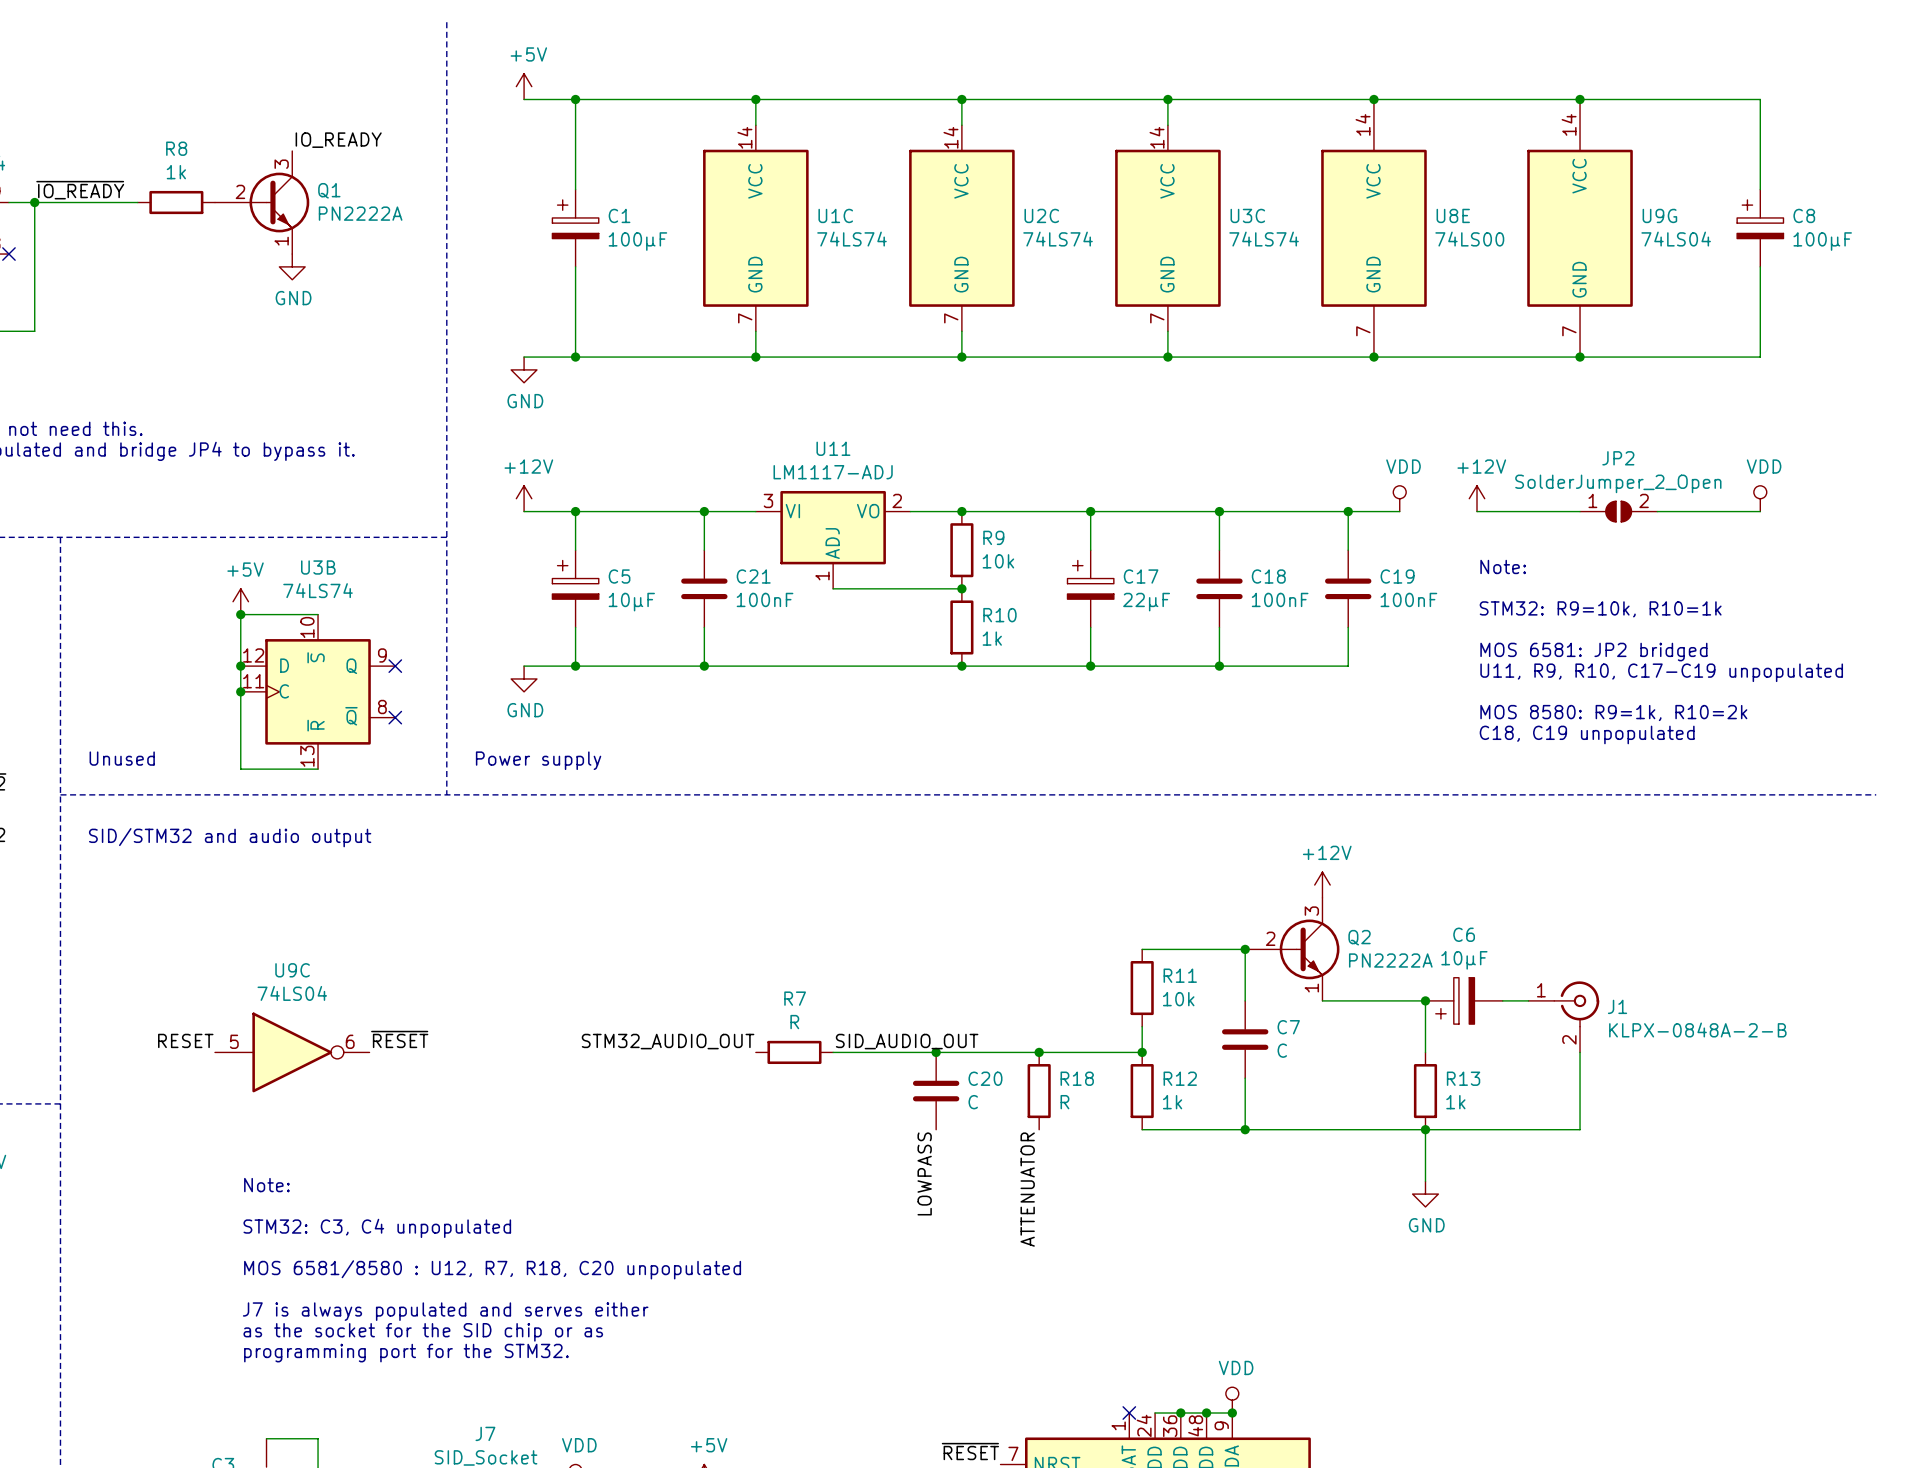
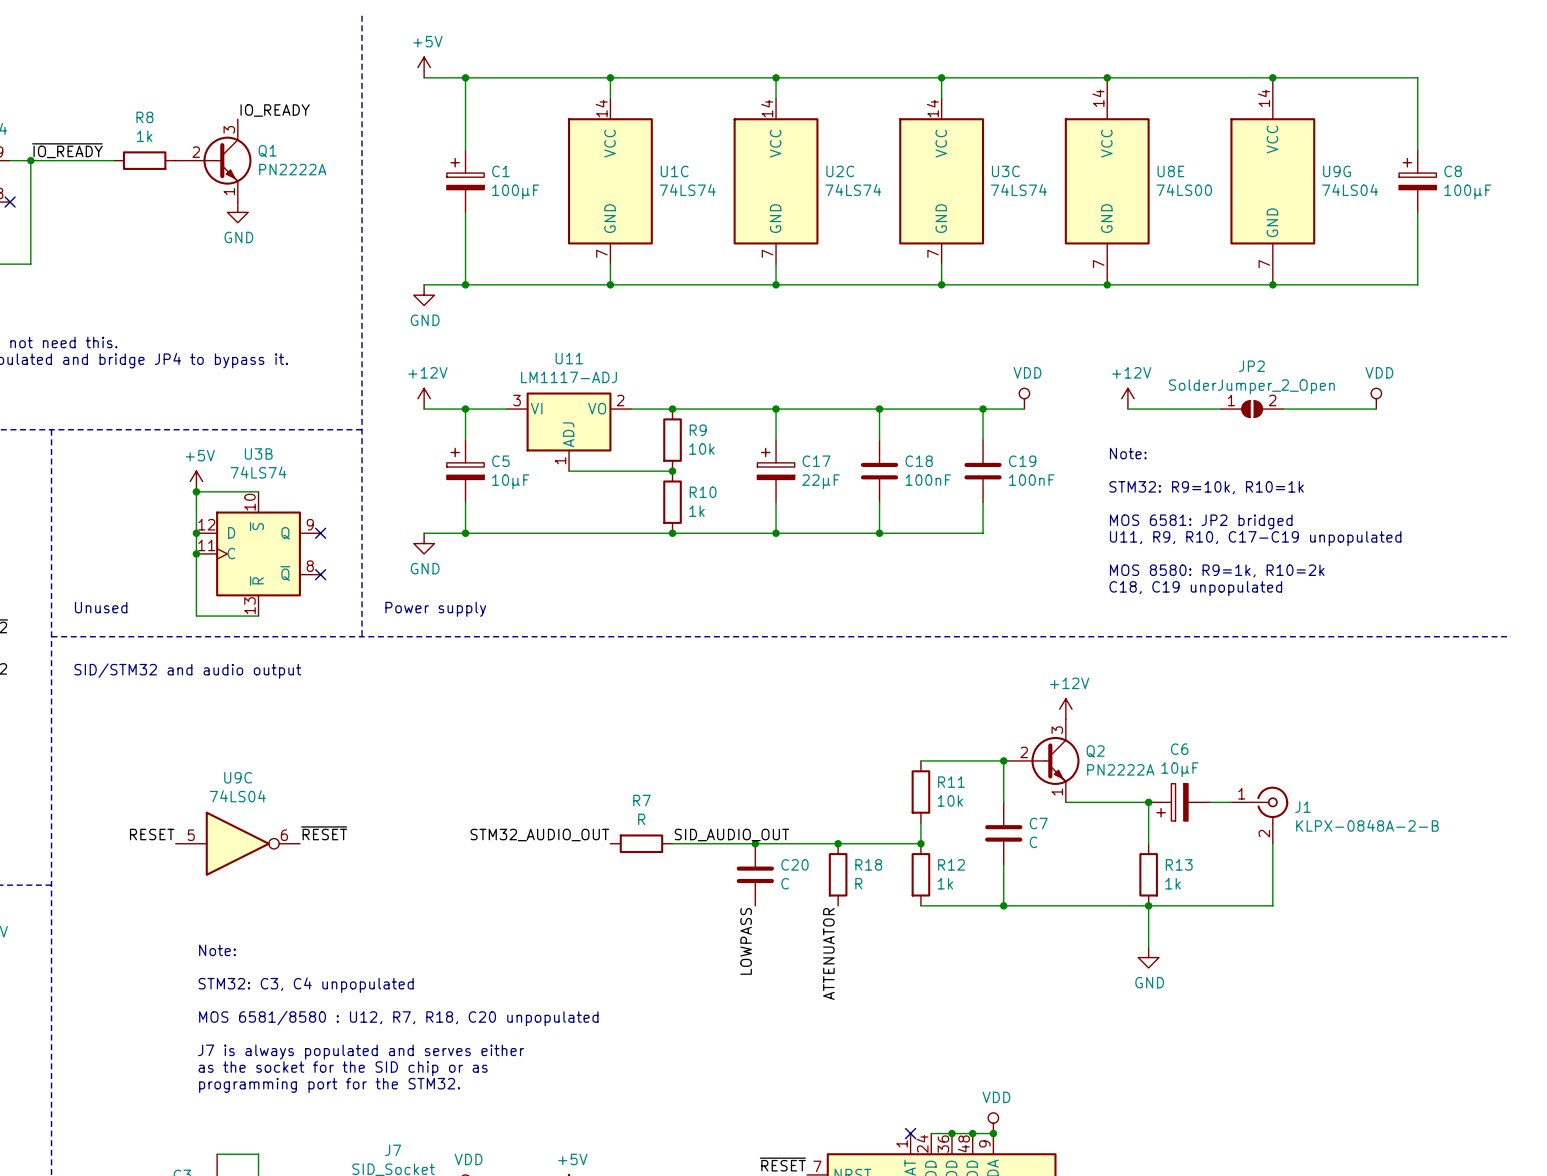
power symbol: none -> VDD (1024, 398)
power symbol: VDD (1399, 498) -> +12V (1127, 398)
power symbol: +12V (1476, 498) -> none
power symbol position: VDD (1760, 498) -> VDD (1376, 398)
junction: (704, 511) -> none
junction: none -> (672, 409)
wire: none -> (776, 409) (776, 440)
wire: (1270, 511) (1399, 511) -> (1190, 409) (1127, 409)
wire: (1348, 511) (1348, 550) -> none
junction: (1348, 511) -> none
JP2 position: (1618, 511) -> (1252, 409)
wire: (1708, 511) (1760, 511) -> none
U11 position: (833, 539) -> (569, 431)
R9 position: (961, 550) -> (672, 440)
text position: Note: (1503, 566) -> Note: (1128, 453)
C18 name: C18 (1268, 576) -> C19 (1022, 461)
C21: 100nF (704, 588) -> none
wire: (833, 588) (961, 588) -> (672, 471) (569, 471)
junction: none -> (672, 471)
junction: (961, 588) -> none
C17 position: (1090, 588) -> (776, 471)
C18: none -> 100nF (879, 471)
C19: 100nF (1348, 588) -> none
text position: STM32: R9=10k, R10=1k (1600, 609) -> STM32: R9=10k, R10=1k (1206, 487)
wire: (704, 627) (704, 666) -> none
wire: none -> (776, 502) (776, 533)
R10 position: (961, 627) -> (672, 502)
wire: (1348, 627) (1348, 666) (1219, 666) -> none
text position: MOS 6581: JP2 bridged (1593, 652) -> MOS 6581: JP2 bridged (1201, 521)
junction: (704, 666) -> none
junction: none -> (672, 533)
junction: (1219, 666) -> none
text position: U11, R9, R10, C17-C19 unpopulated (1661, 672) -> U11, R9, R10, C17-C19 unpopulated (1255, 538)
text position: MOS 8580: R9=1k, R10=2k (1613, 713) -> MOS 8580: R9=1k, R10=2k (1217, 570)
text position: C18, C19 unpopulated (1587, 734) -> C18, C19 unpopulated (1195, 588)

